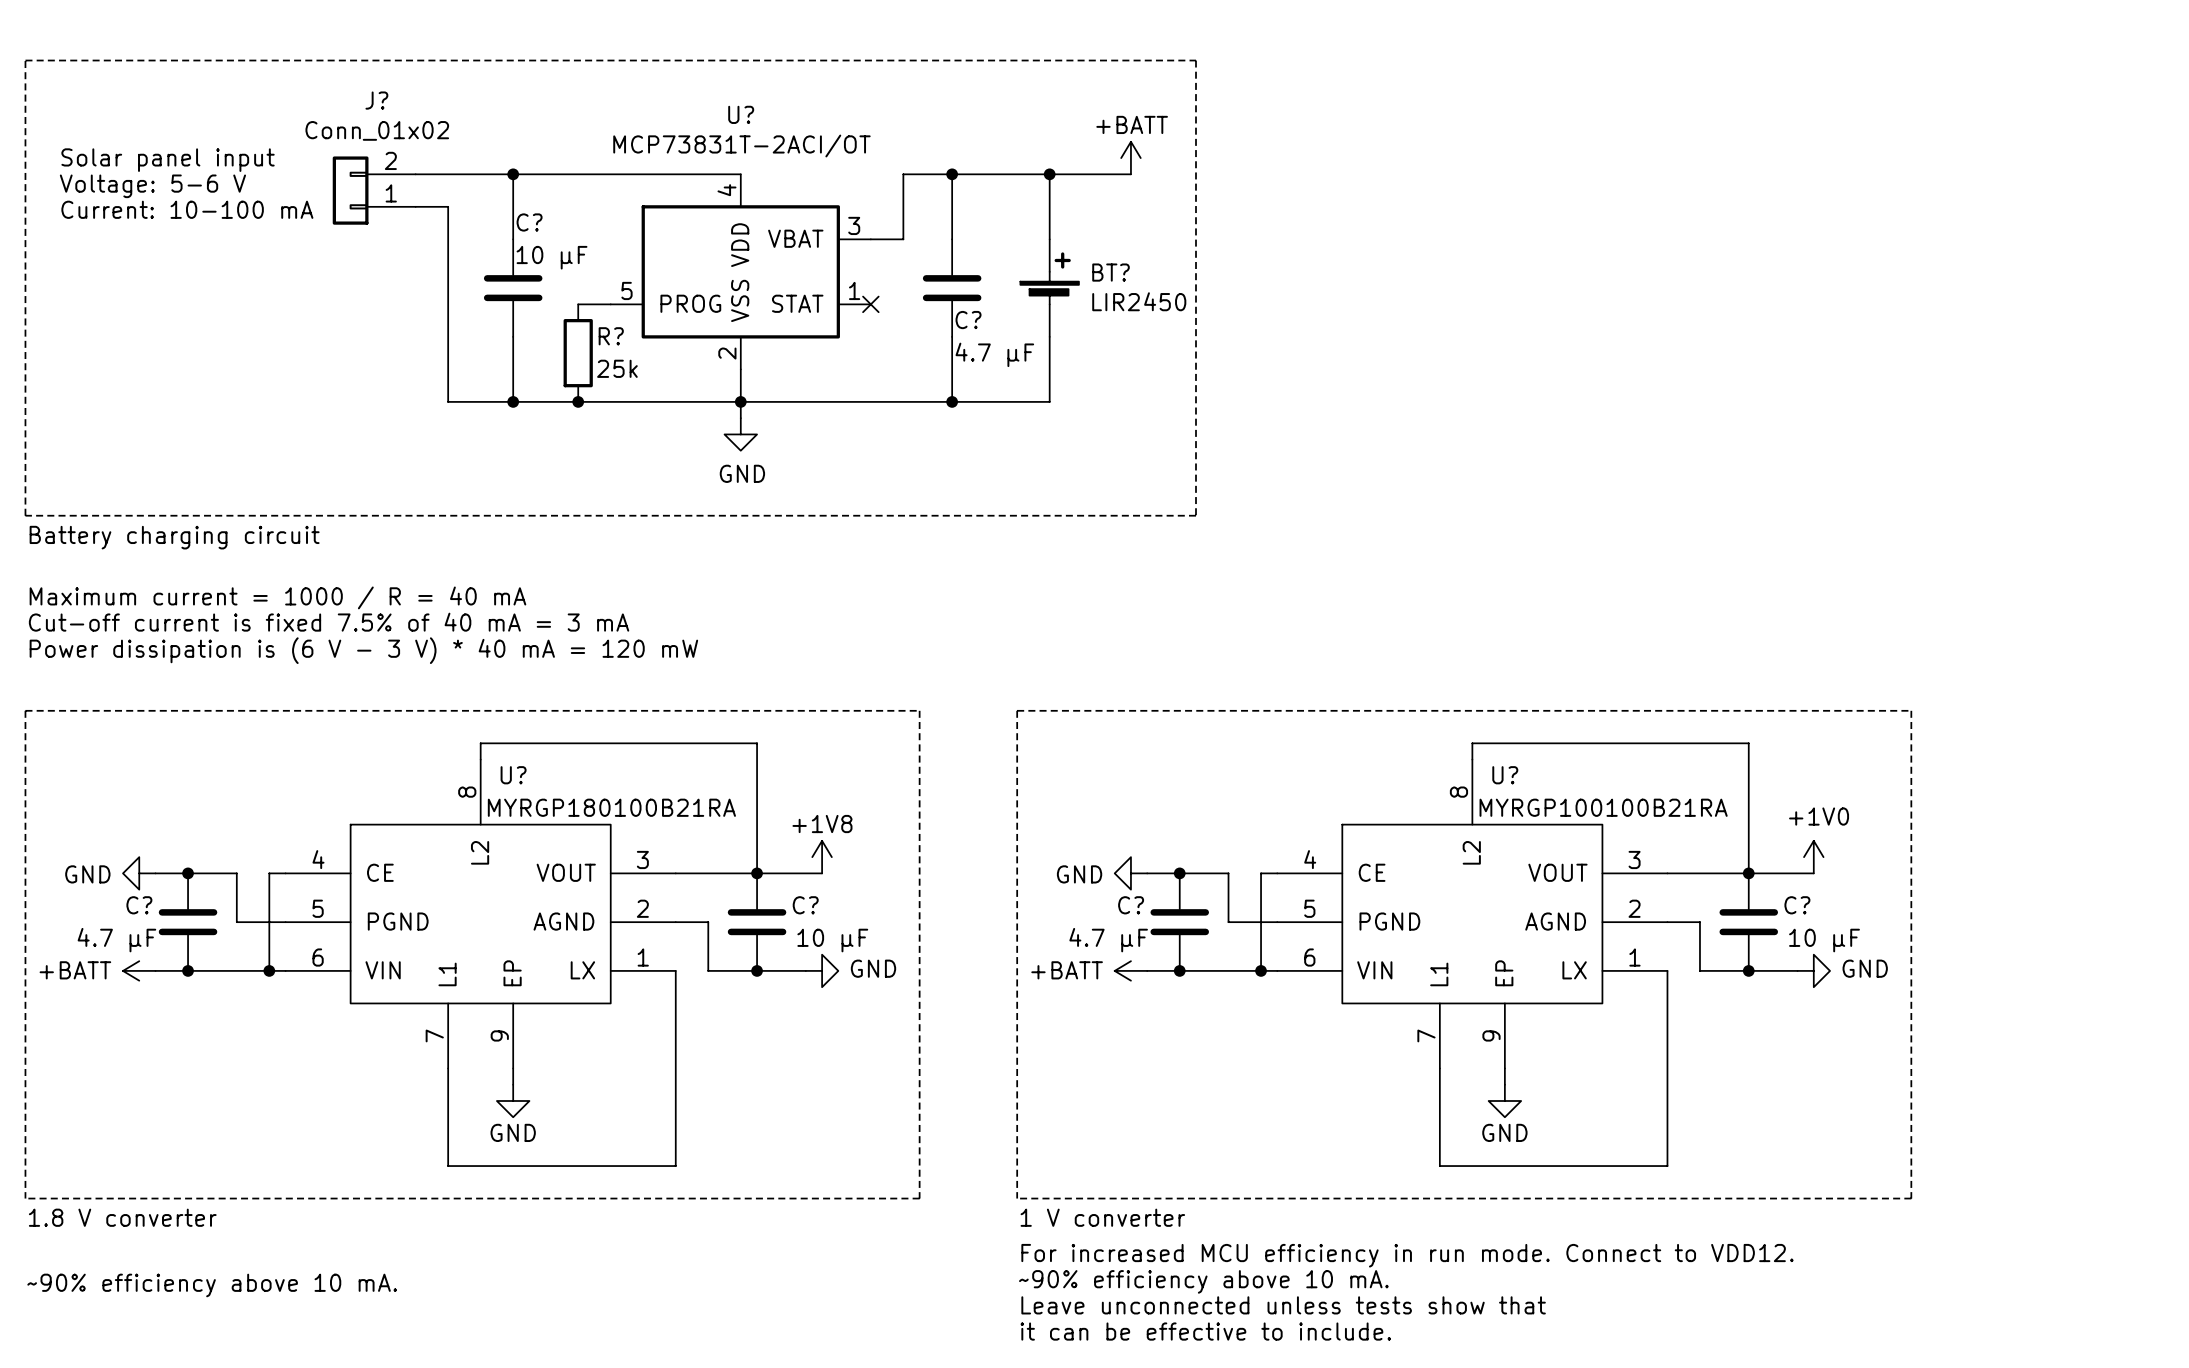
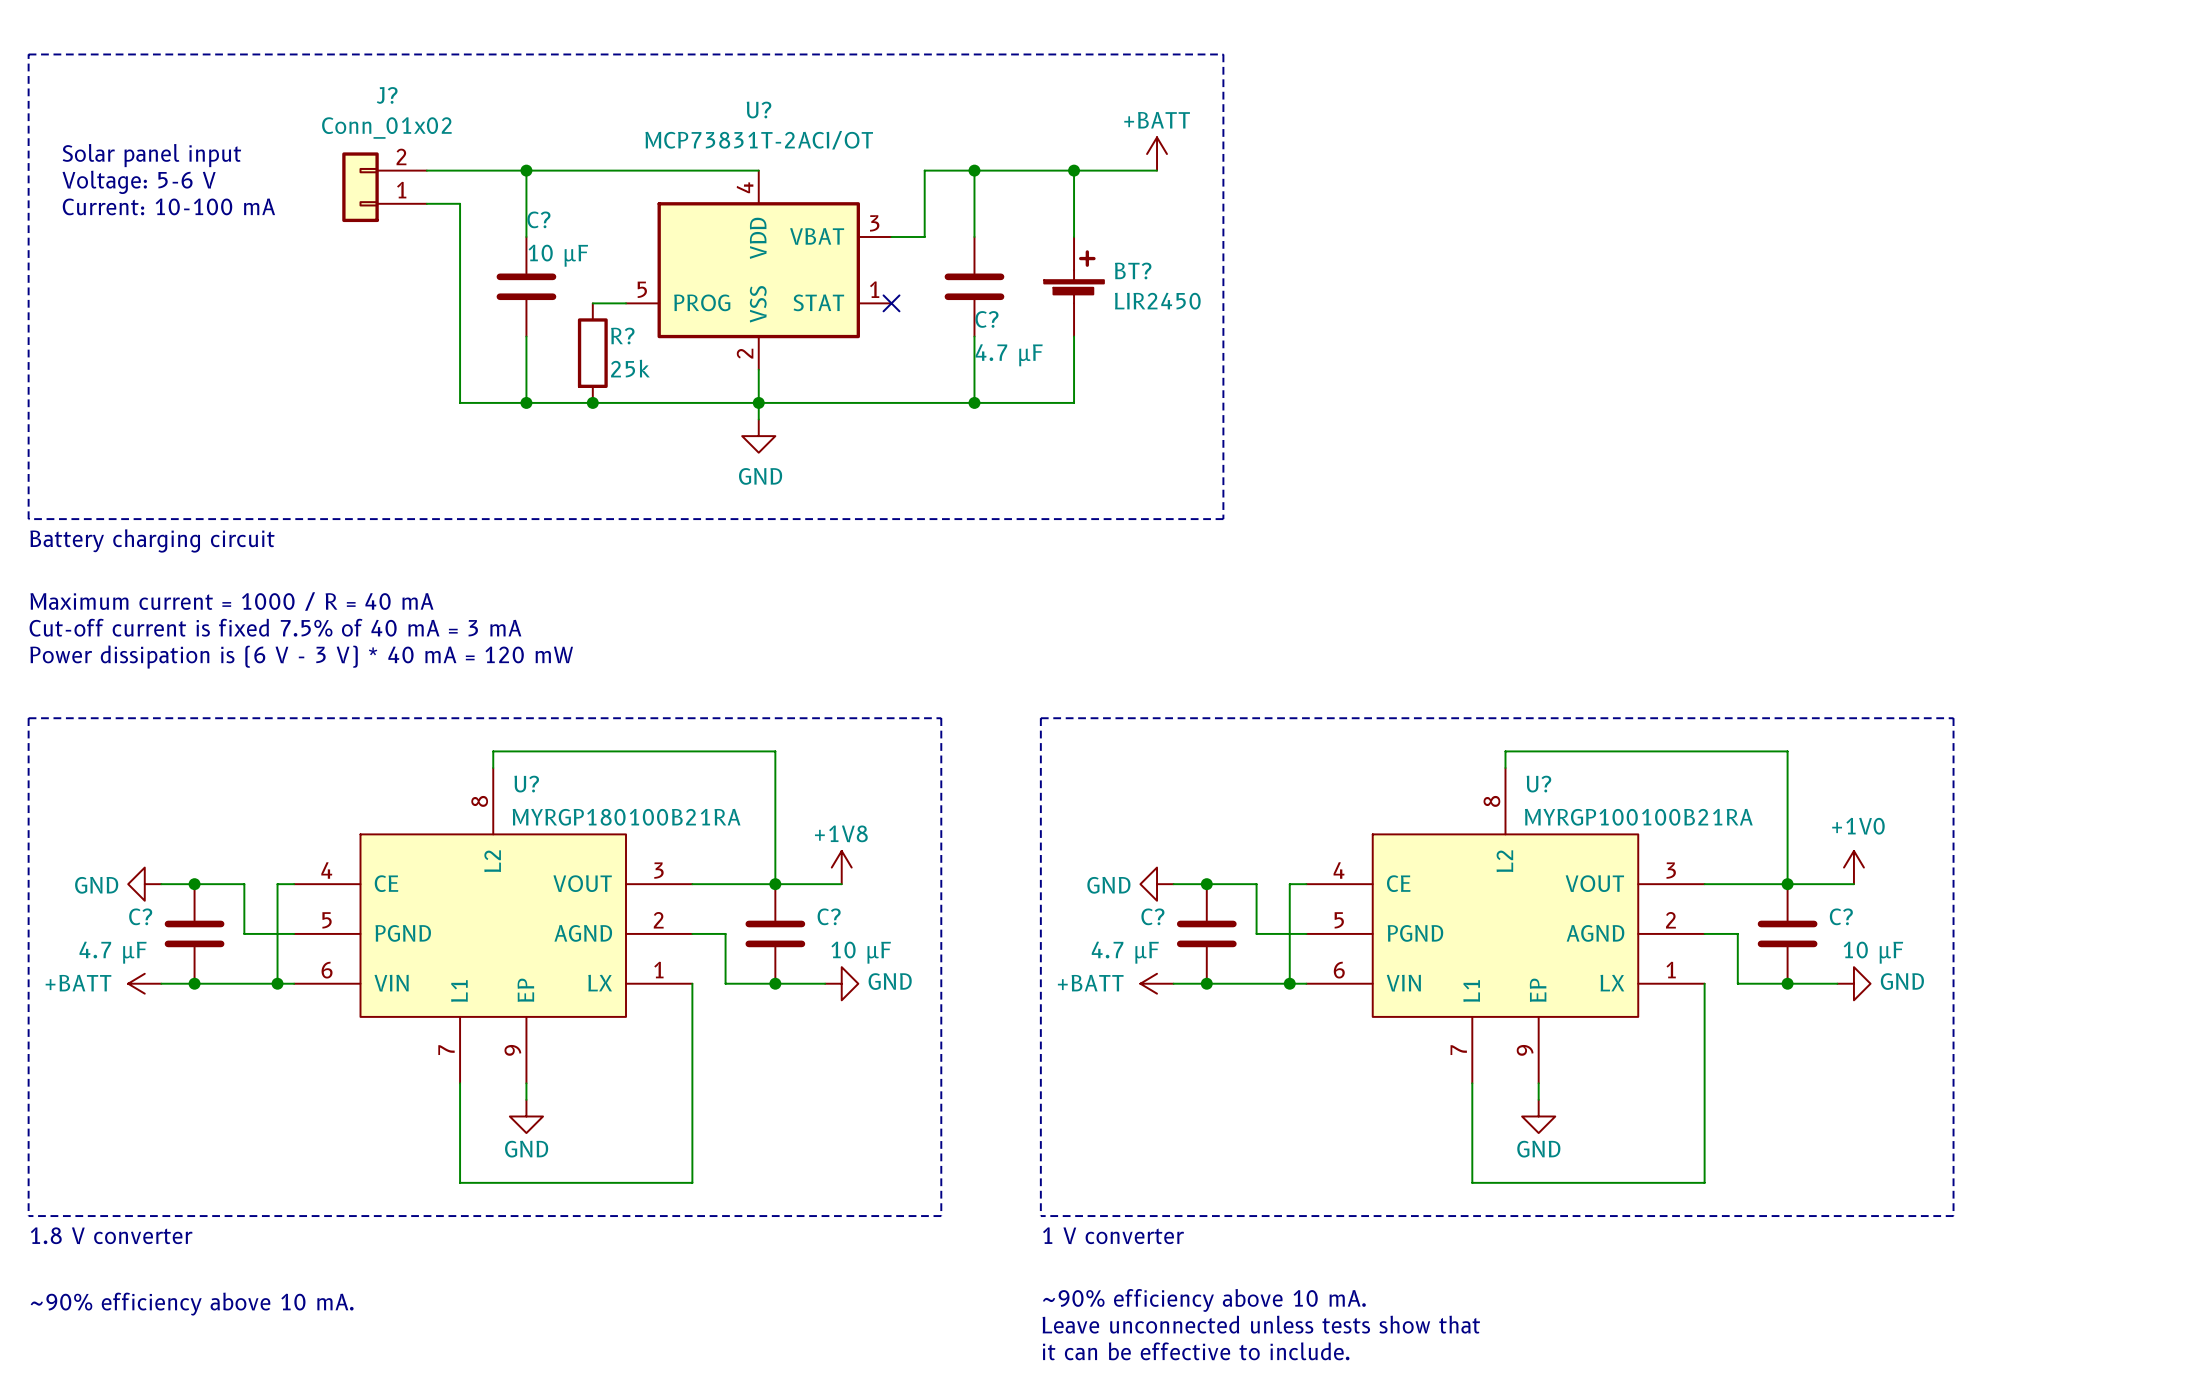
text: For increased MCU efficiency in run mode. Connect to VDD12. (1407, 1255) -> none

